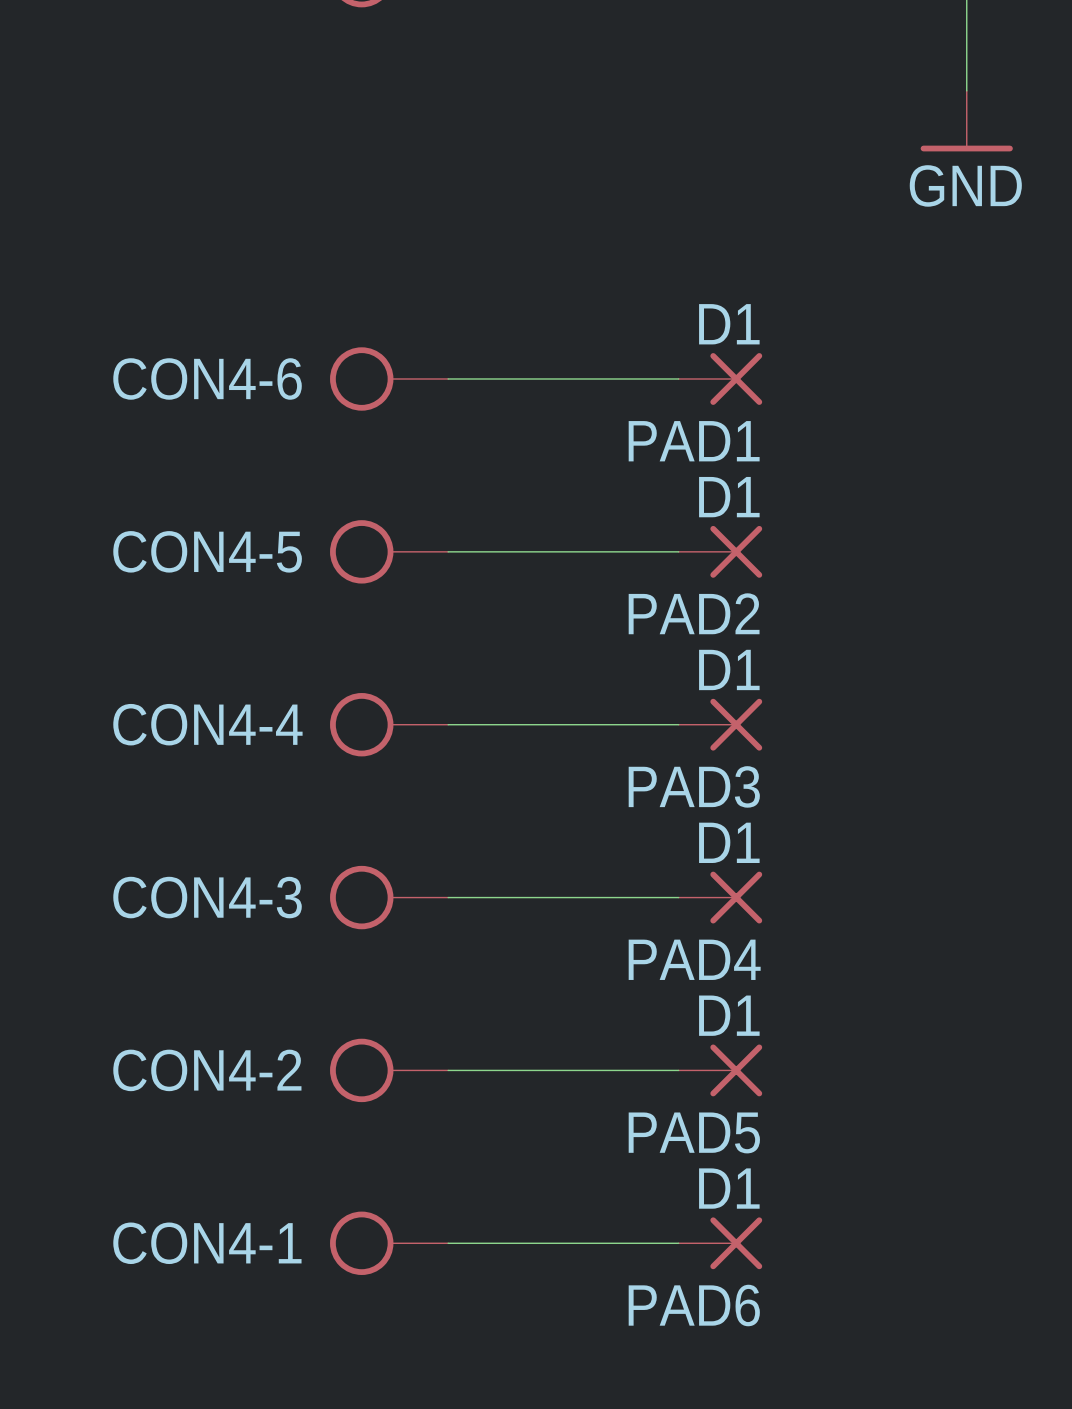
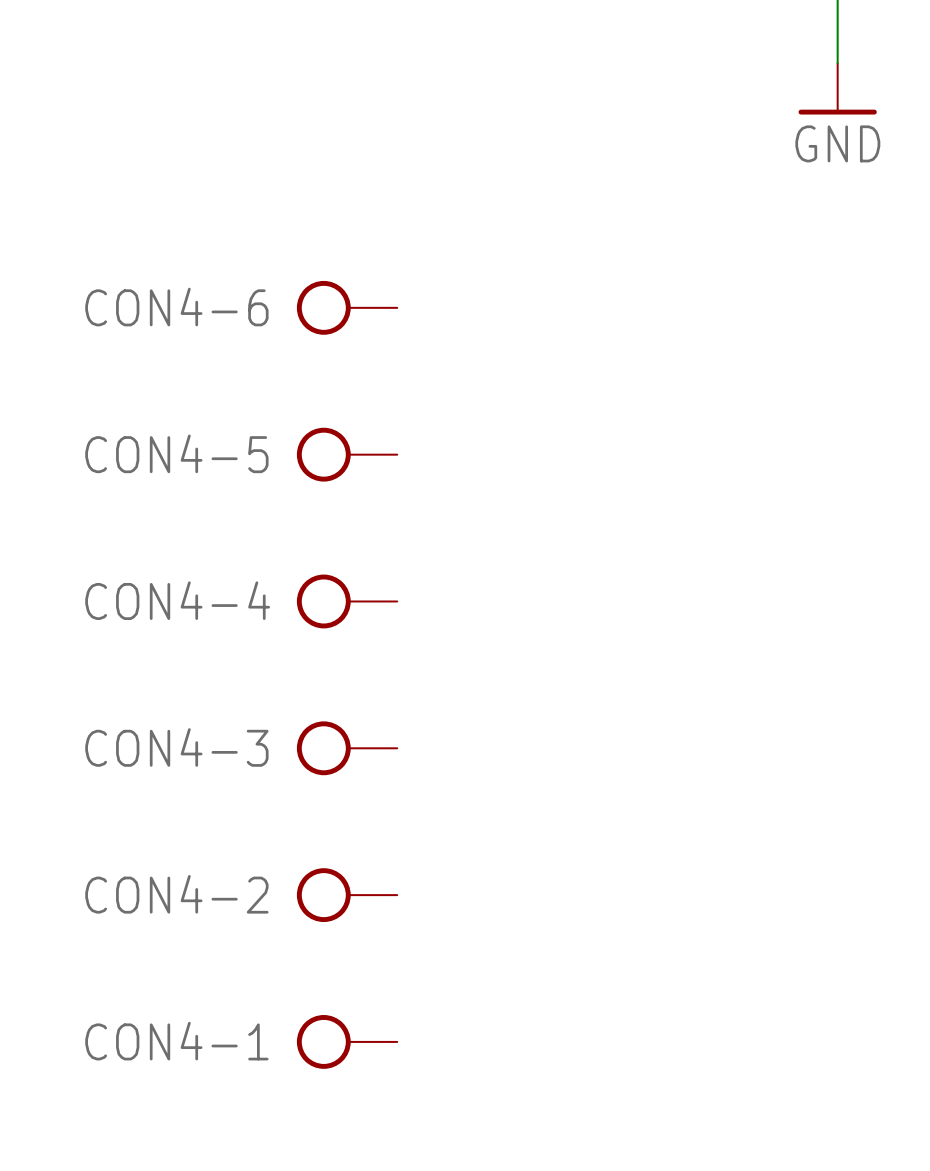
wire: (448, 378) (678, 378) -> none
PAD1: D1 (720, 378) -> none
wire: (448, 551) (678, 551) -> none
PAD2: D1 (720, 551) -> none
wire: (448, 724) (678, 724) -> none
PAD3: D1 (720, 724) -> none
wire: (448, 897) (678, 897) -> none
PAD4: D1 (720, 897) -> none
wire: (448, 1070) (678, 1070) -> none
PAD5: D1 (720, 1070) -> none
wire: (448, 1243) (678, 1243) -> none
PAD6: D1 (720, 1243) -> none

